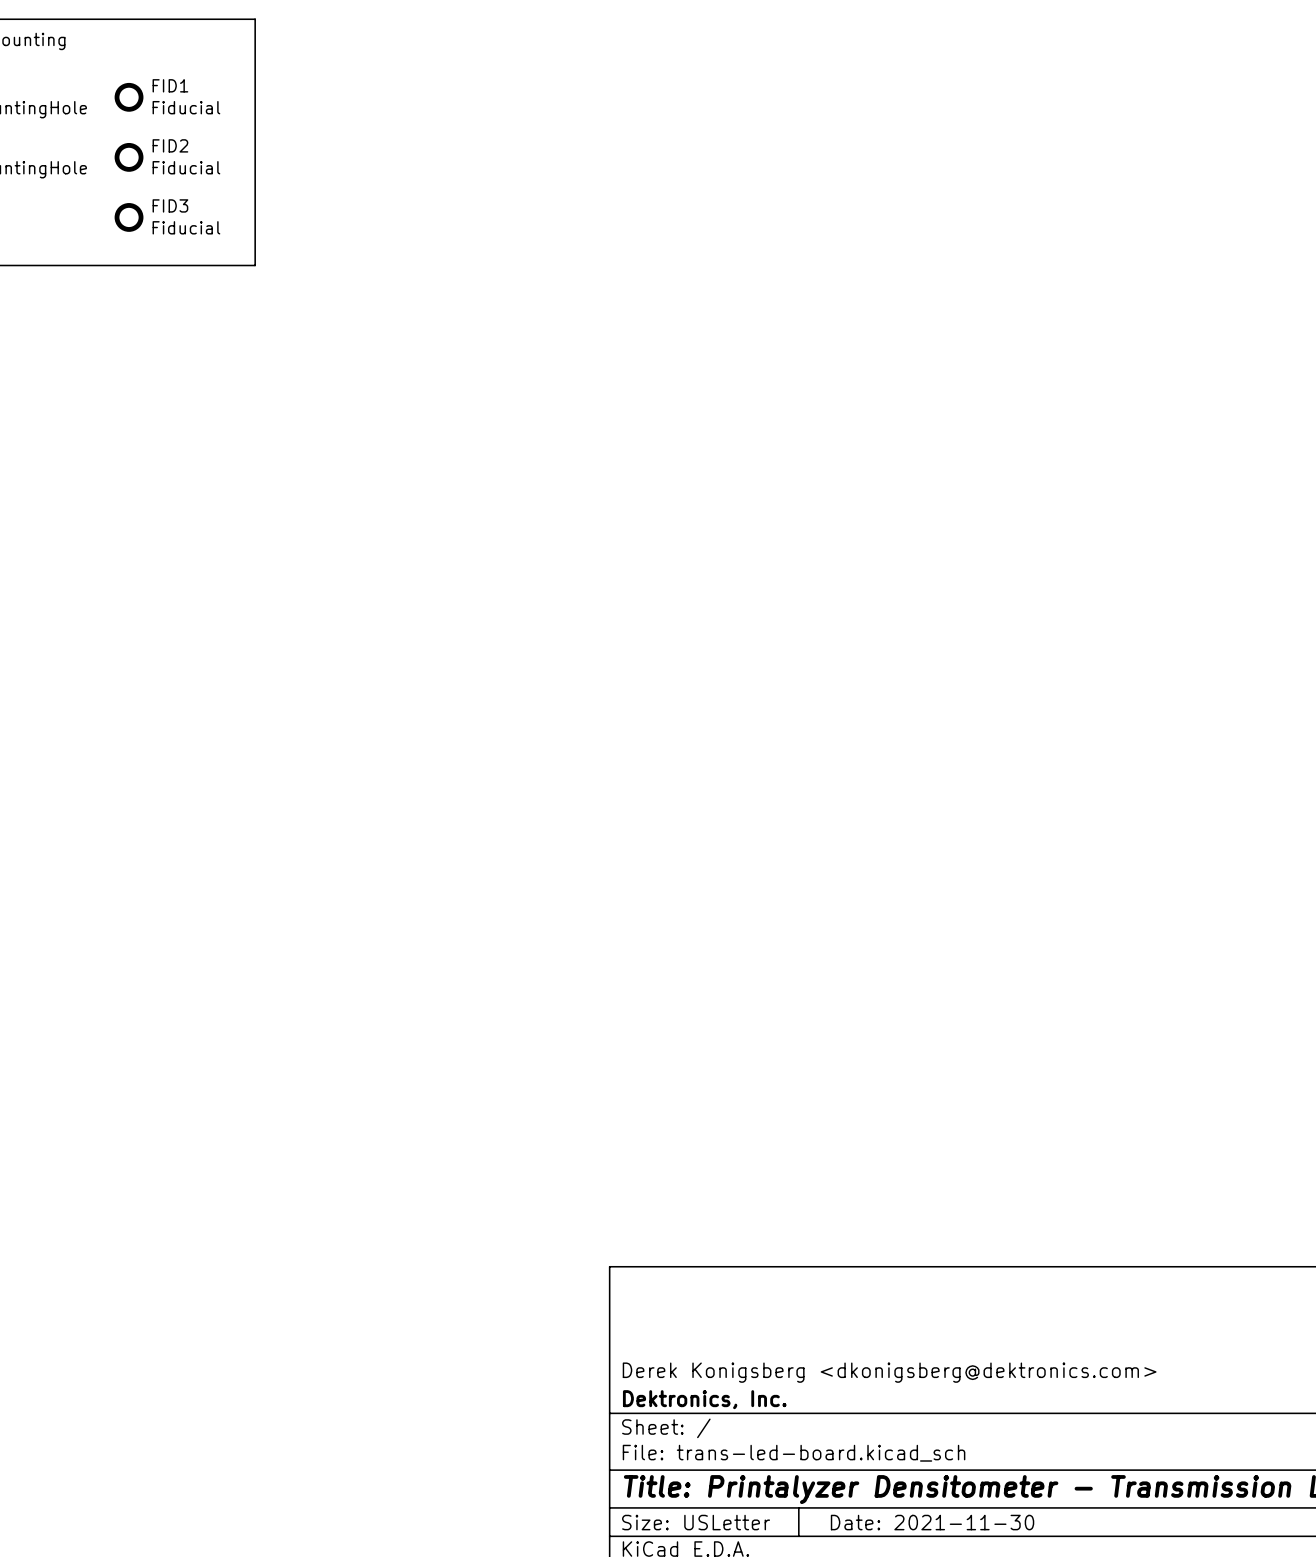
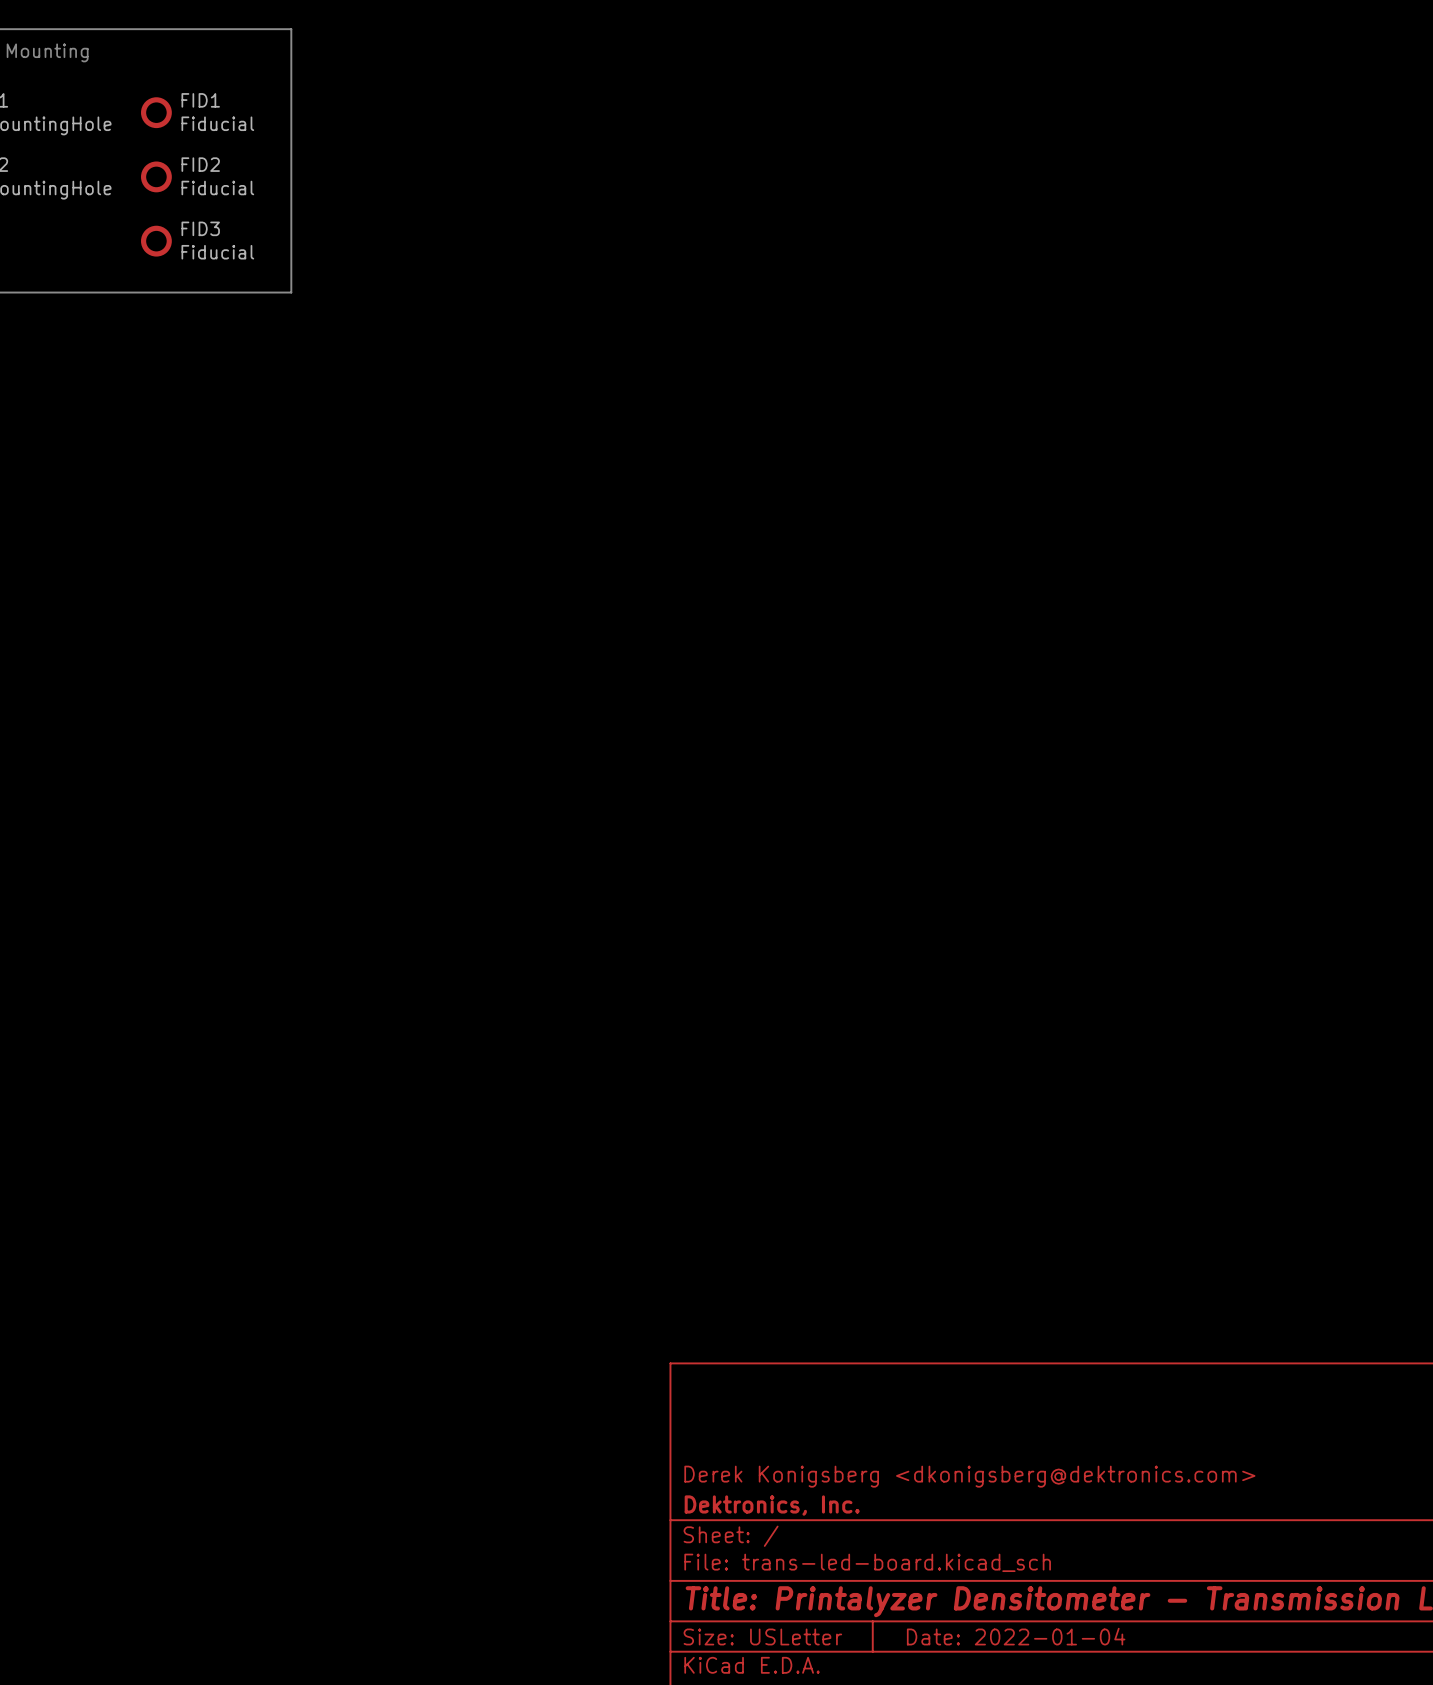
title block: Date: 2021-11-30 (932, 1522) -> Date: 2022-01-04 (1016, 1636)

